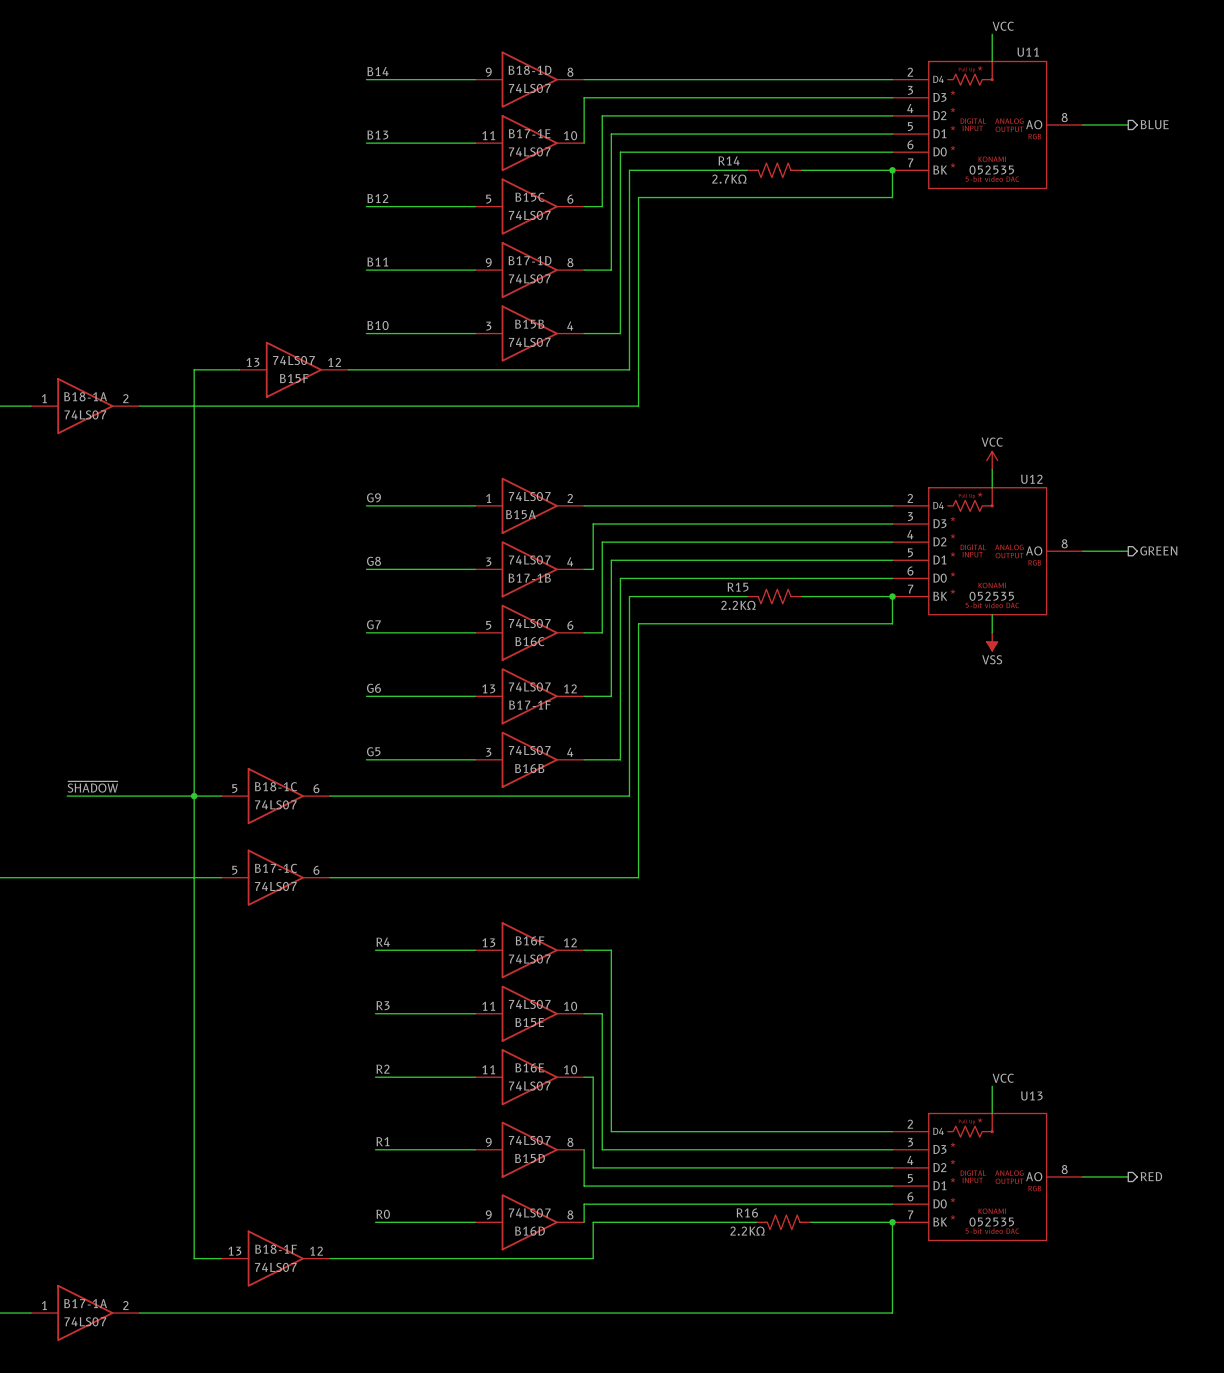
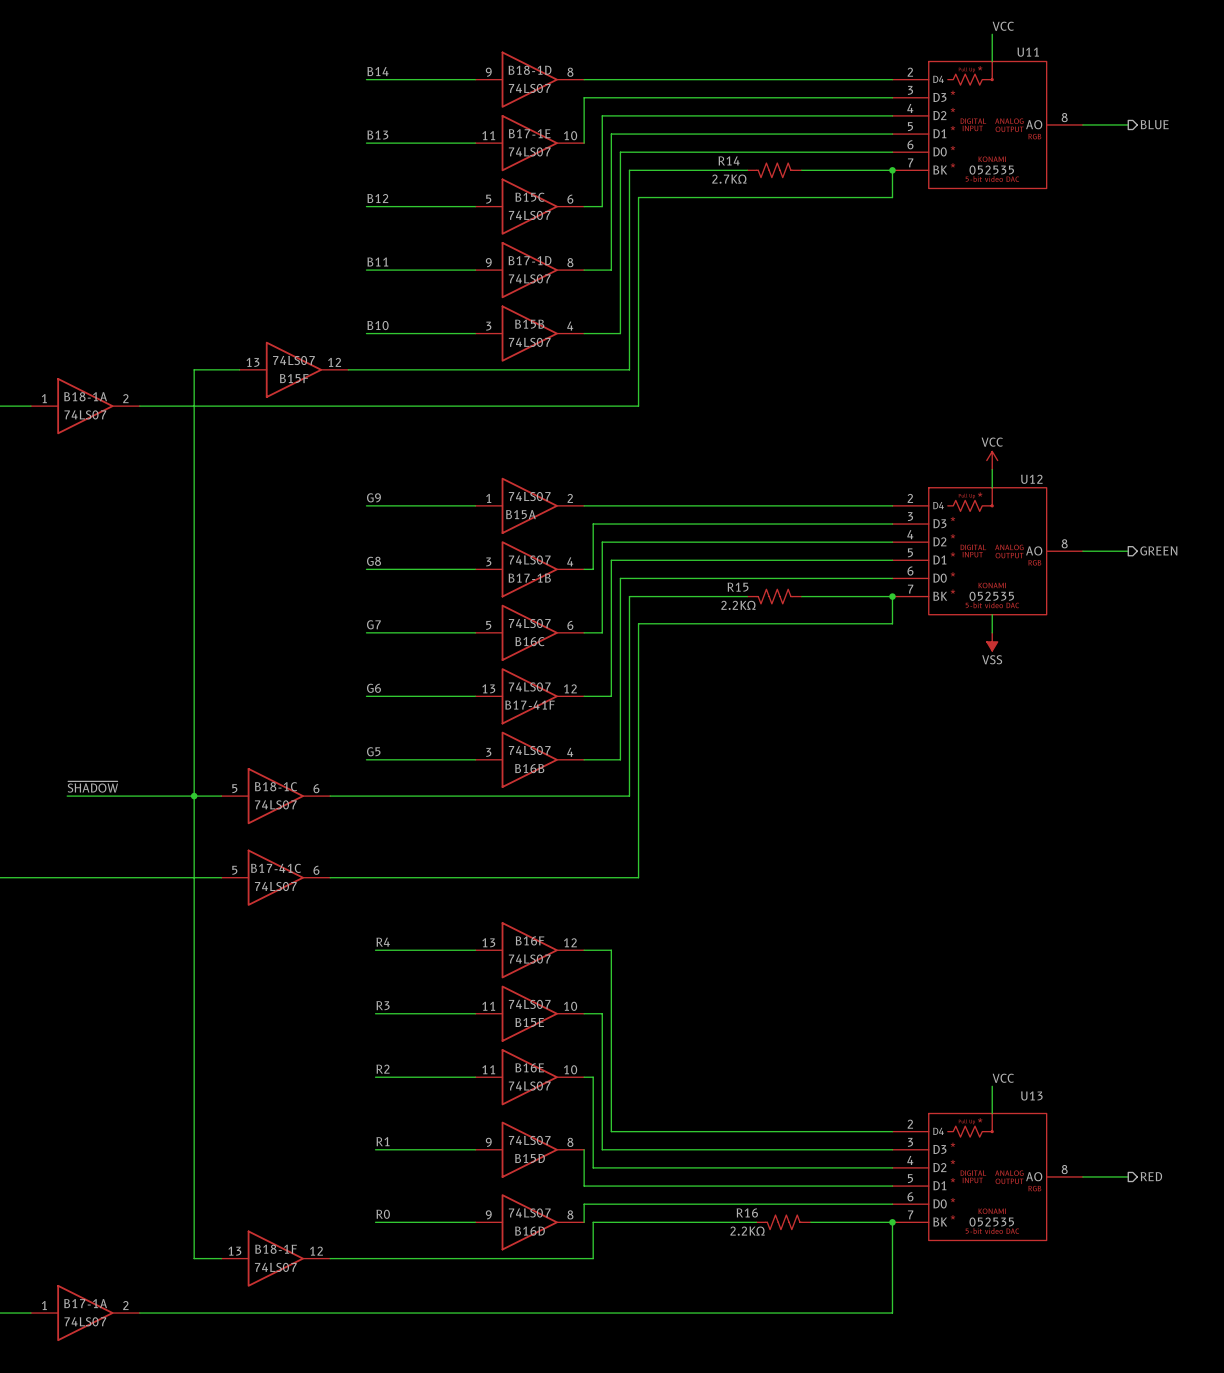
B17-1F name: B17-1F (530, 705) -> B17-41F (530, 705)
B17-1C name: B17-1C (276, 868) -> B17-41C (276, 868)

